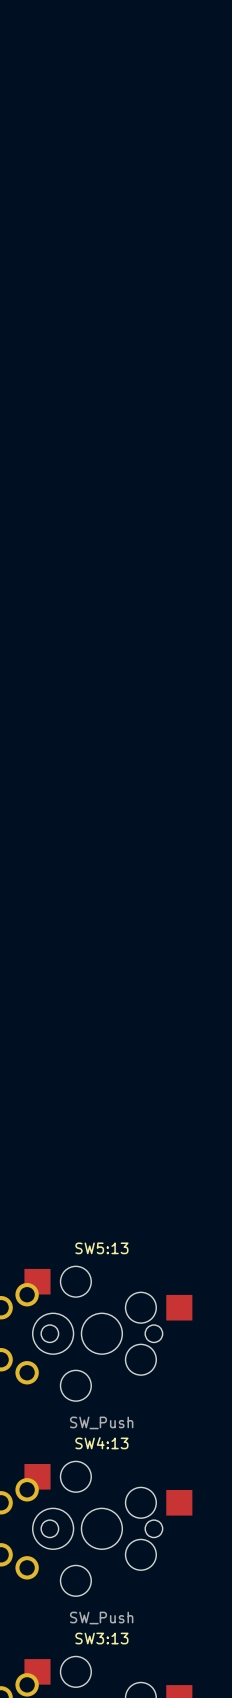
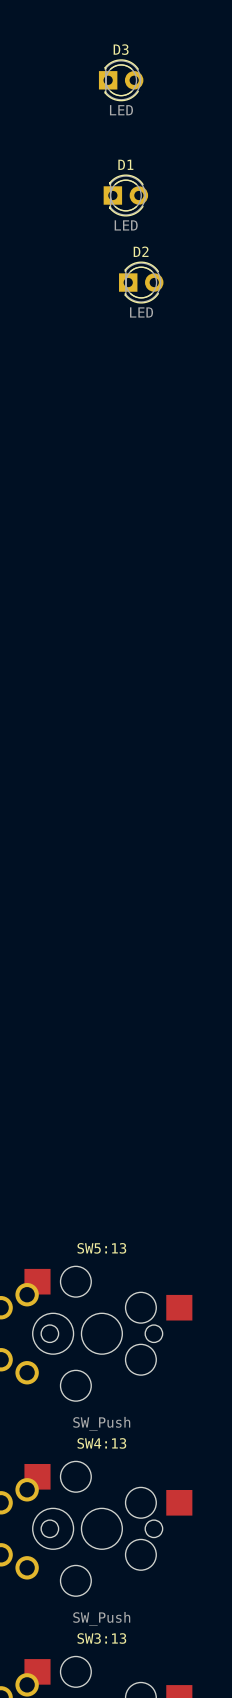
D3: none -> LED (121, 80)
D1: none -> LED (125, 195)
D2: none -> LED (141, 282)

